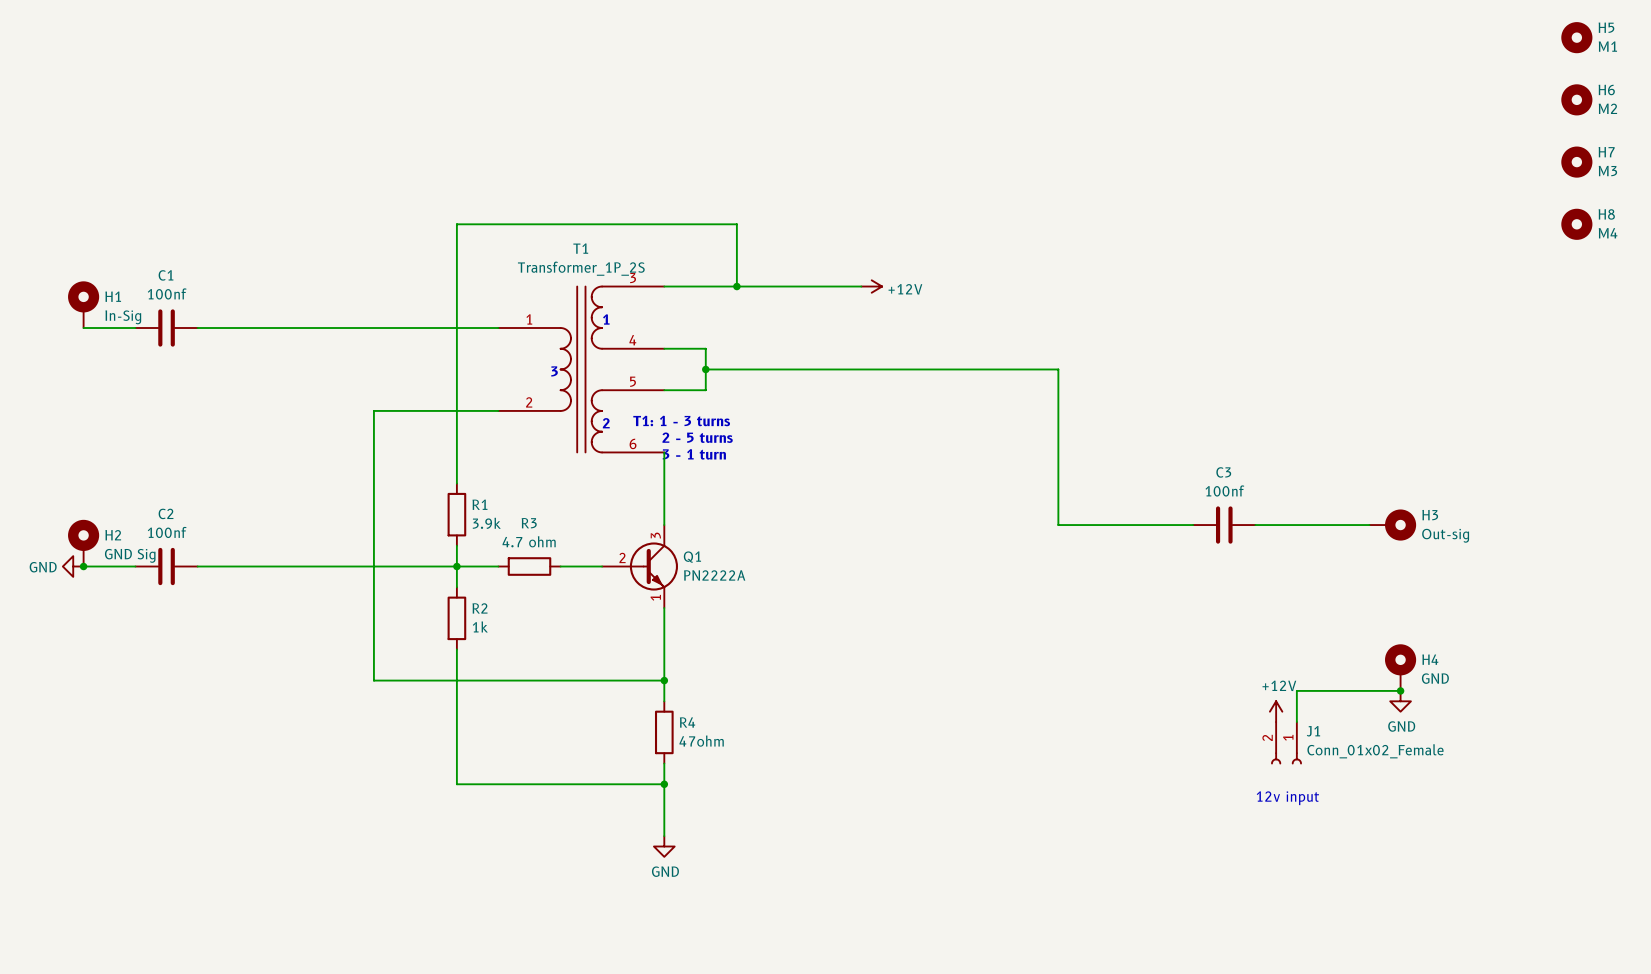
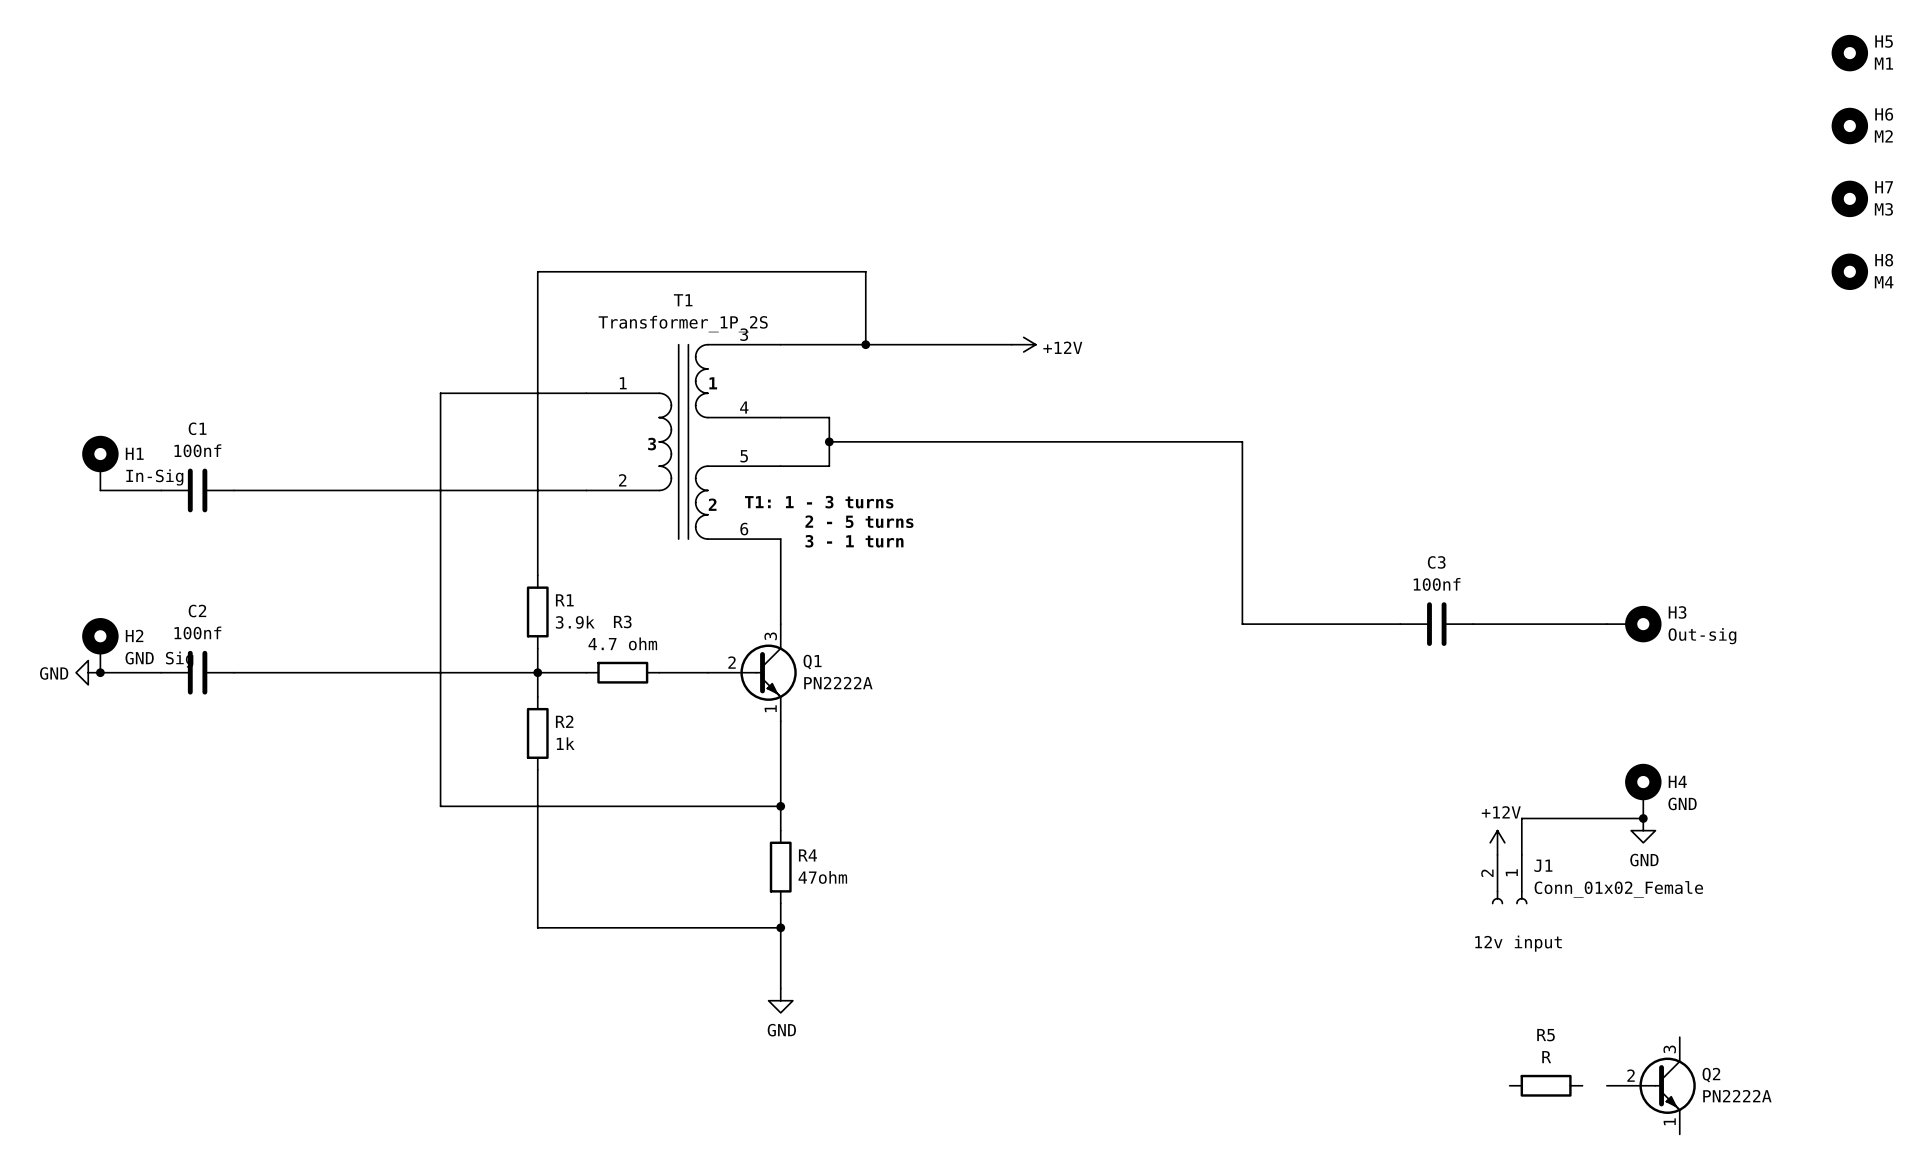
H1 position: (83, 304) -> (100, 463)
wire: (83, 328) (135, 328) -> (100, 490) (161, 490)
C1 position: (166, 328) -> (197, 490)
wire: (197, 328) (373, 328) -> (234, 490) (440, 490) (440, 393)
R5: none -> R (1546, 1085)
Q2: none -> PN2222A (1651, 1085)

